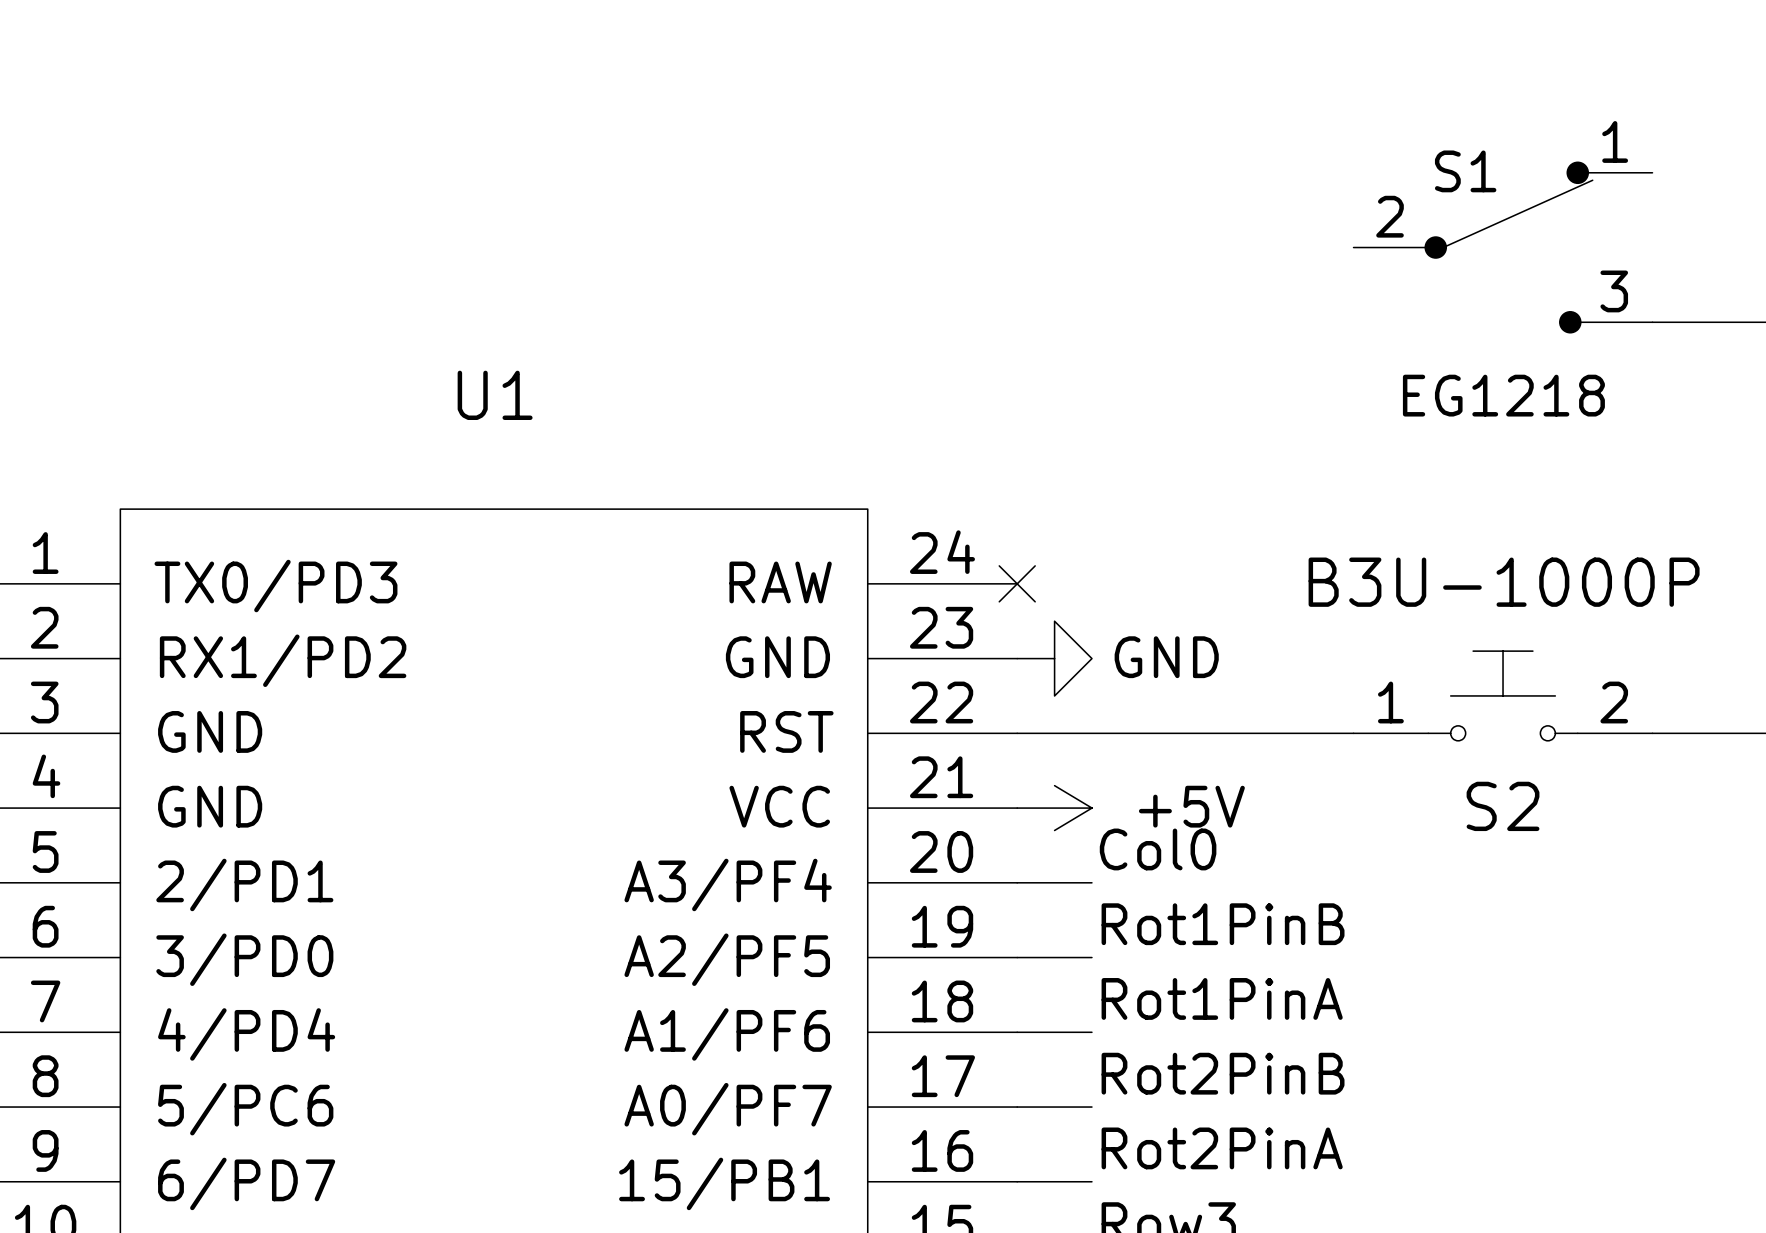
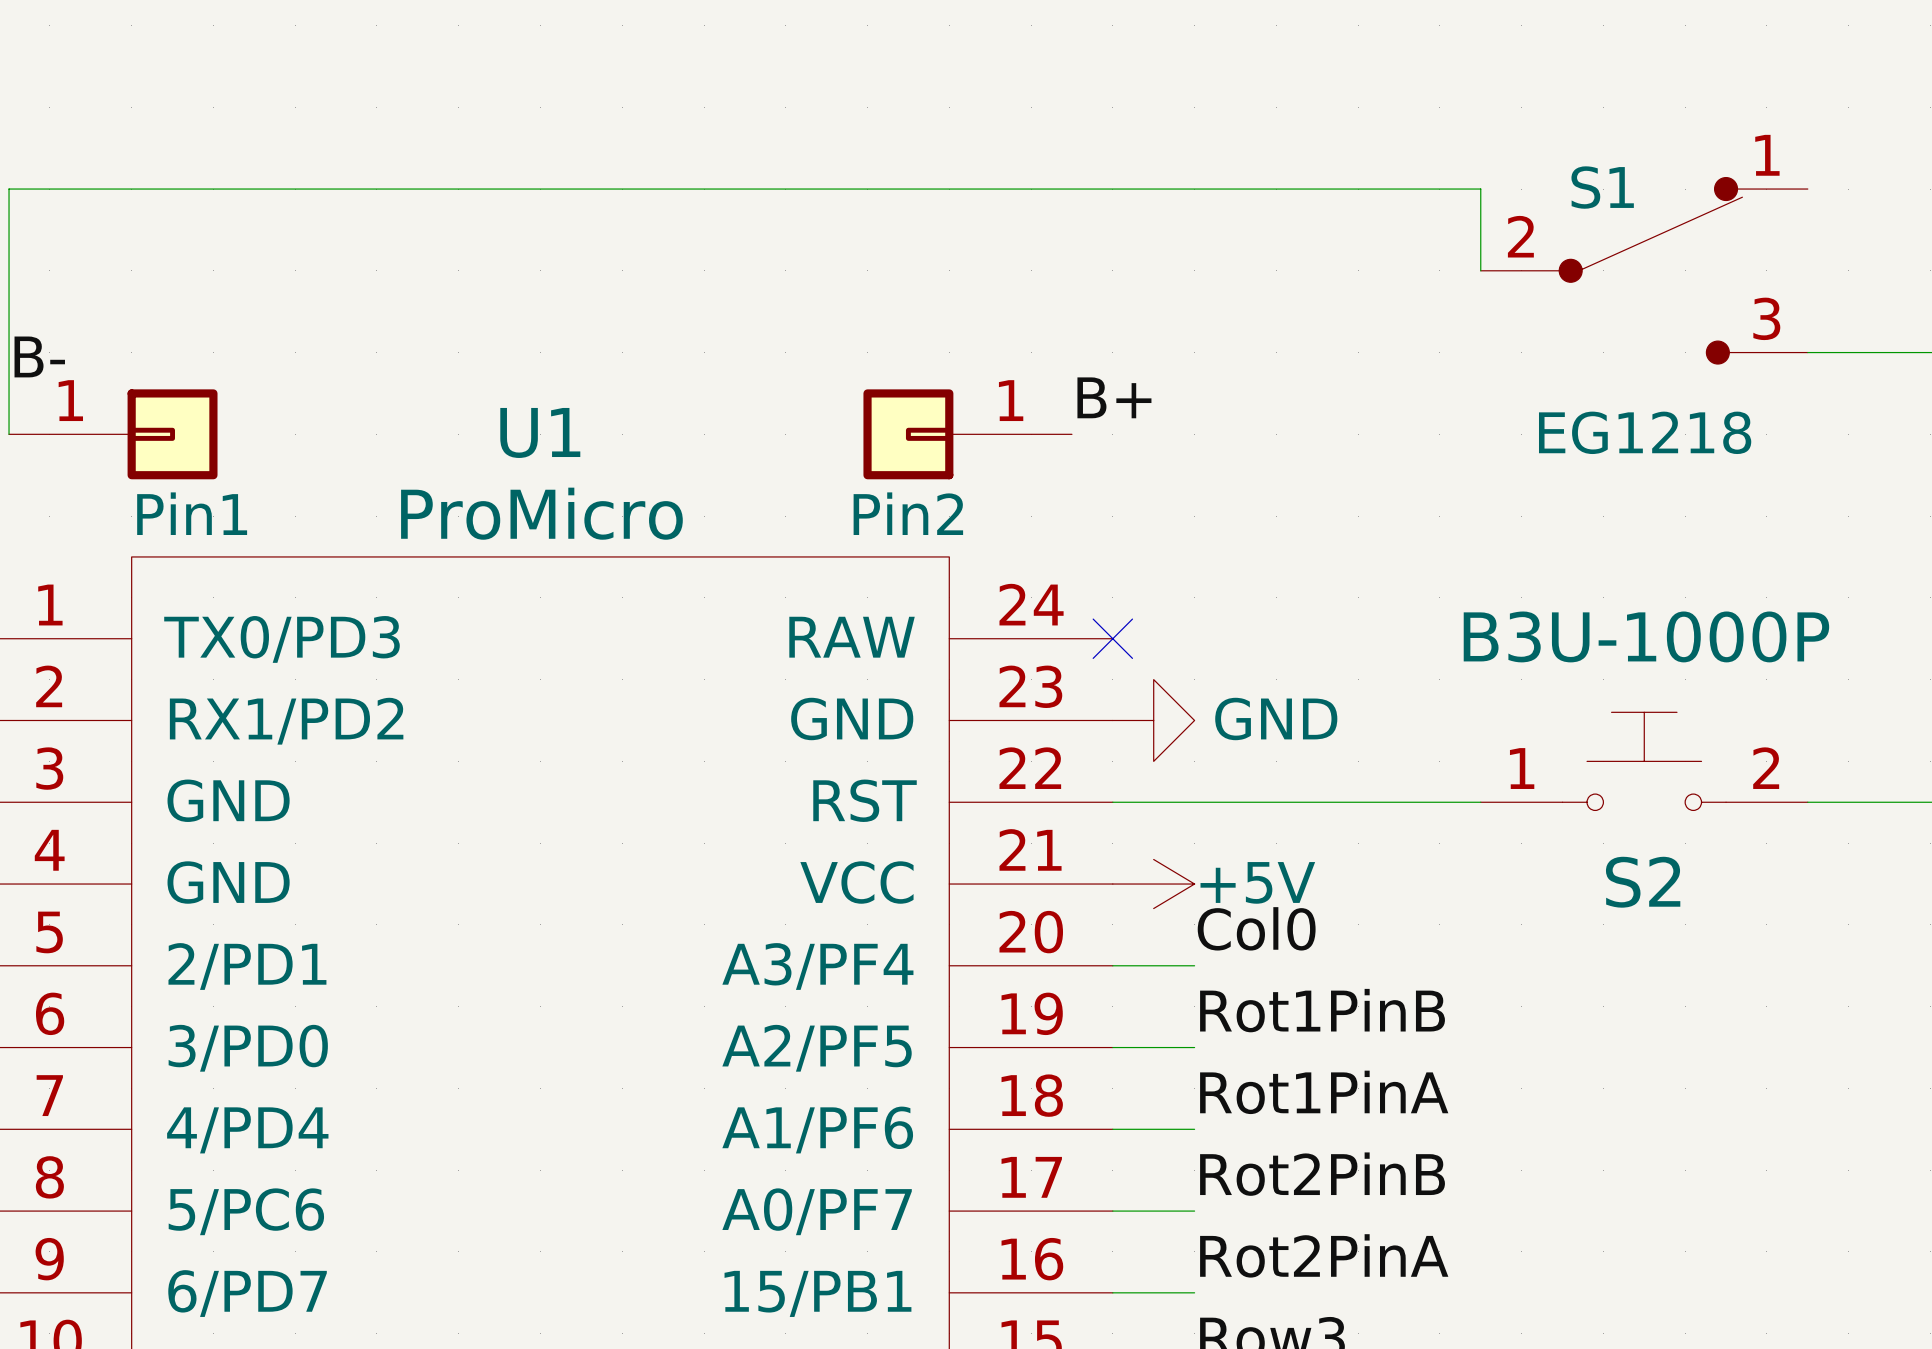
wire: none -> (1480, 270) (1480, 189) (9, 189) (9, 434)
label: none -> B- (39, 356)
label: none -> B+ (1114, 397)
Pin1: none -> (113, 434)
Pin2: none -> (967, 434)
U1 value: none -> ProMicro (541, 513)
power symbol text position: +5V (1191, 806) -> +5V (1257, 882)

